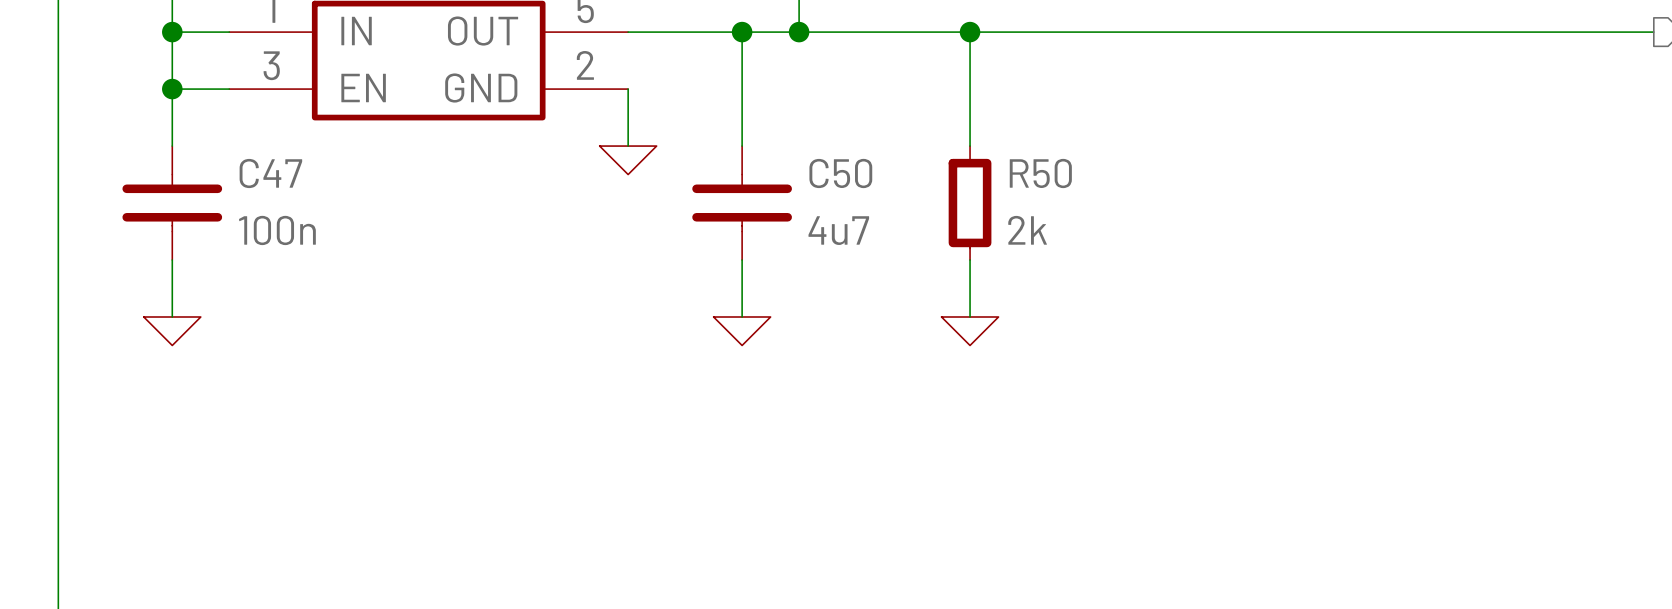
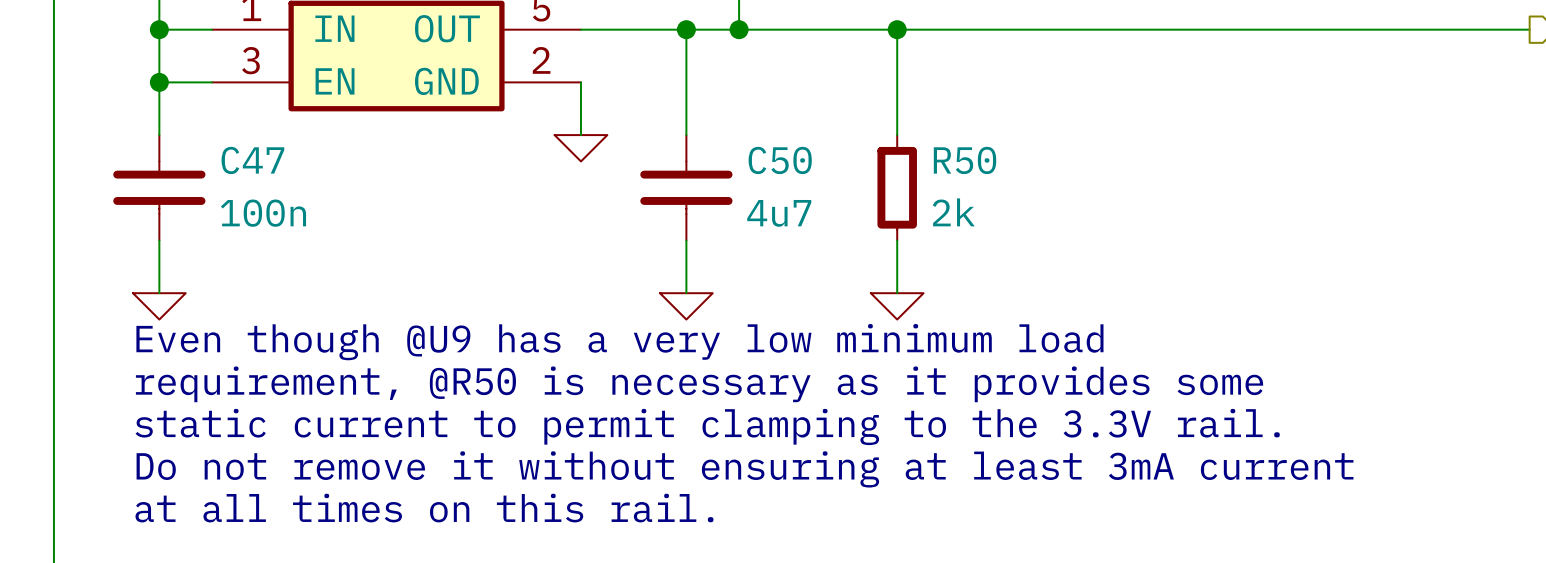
text: none -> Even though @U9 has a very low minimum load (619, 342)
text: none -> requirement, @R50 is necessary as it provides some (699, 384)
text: none -> static current to permit clamping to the 3.3V rail. (707, 426)
text: none -> Do not remove it without ensuring at least 3mA current (745, 469)
text: none -> at all times on this rail. (424, 508)

